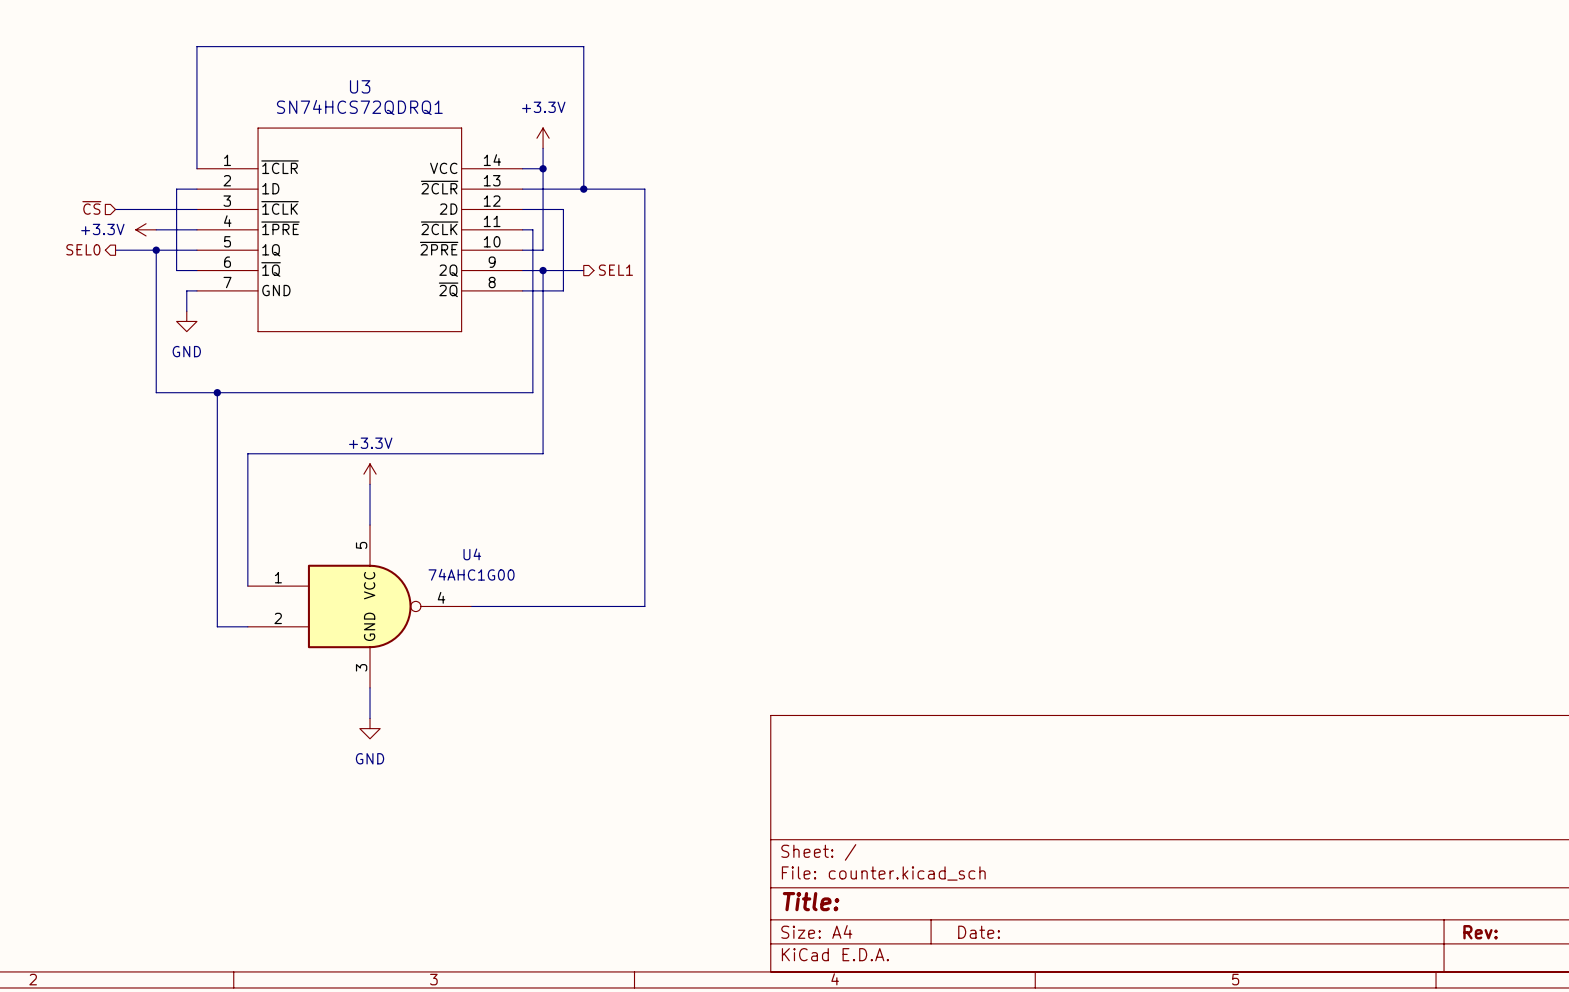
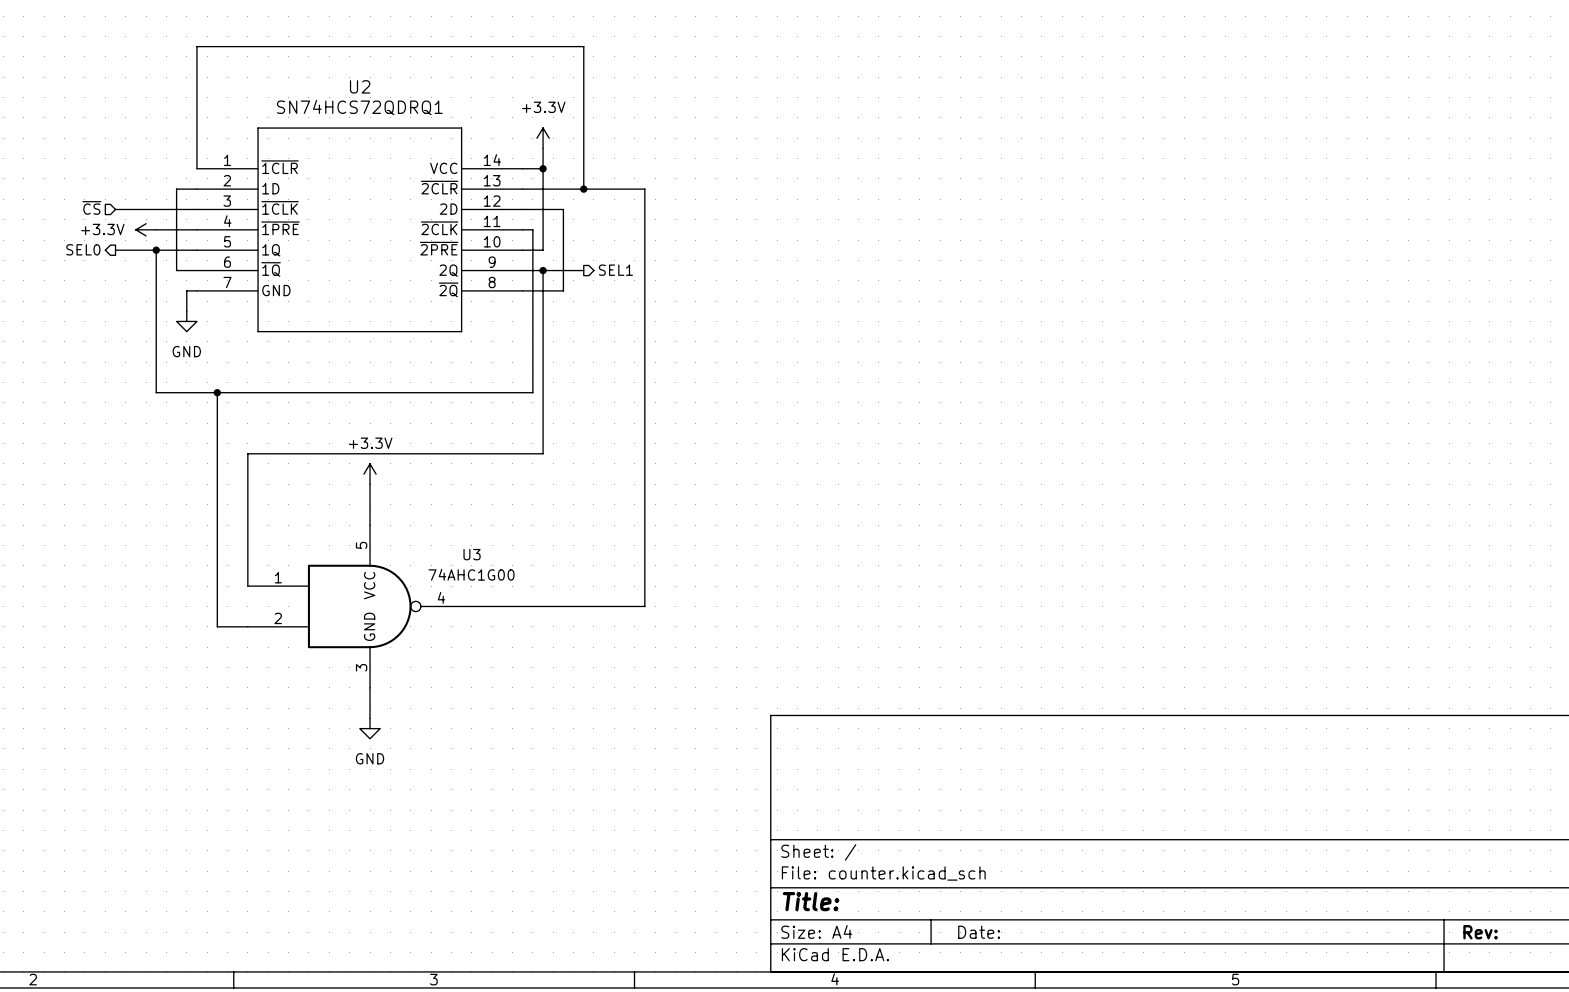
U3 name: U3 (360, 86) -> U2 (360, 86)
U4 name: U4 (472, 554) -> U3 (472, 554)

